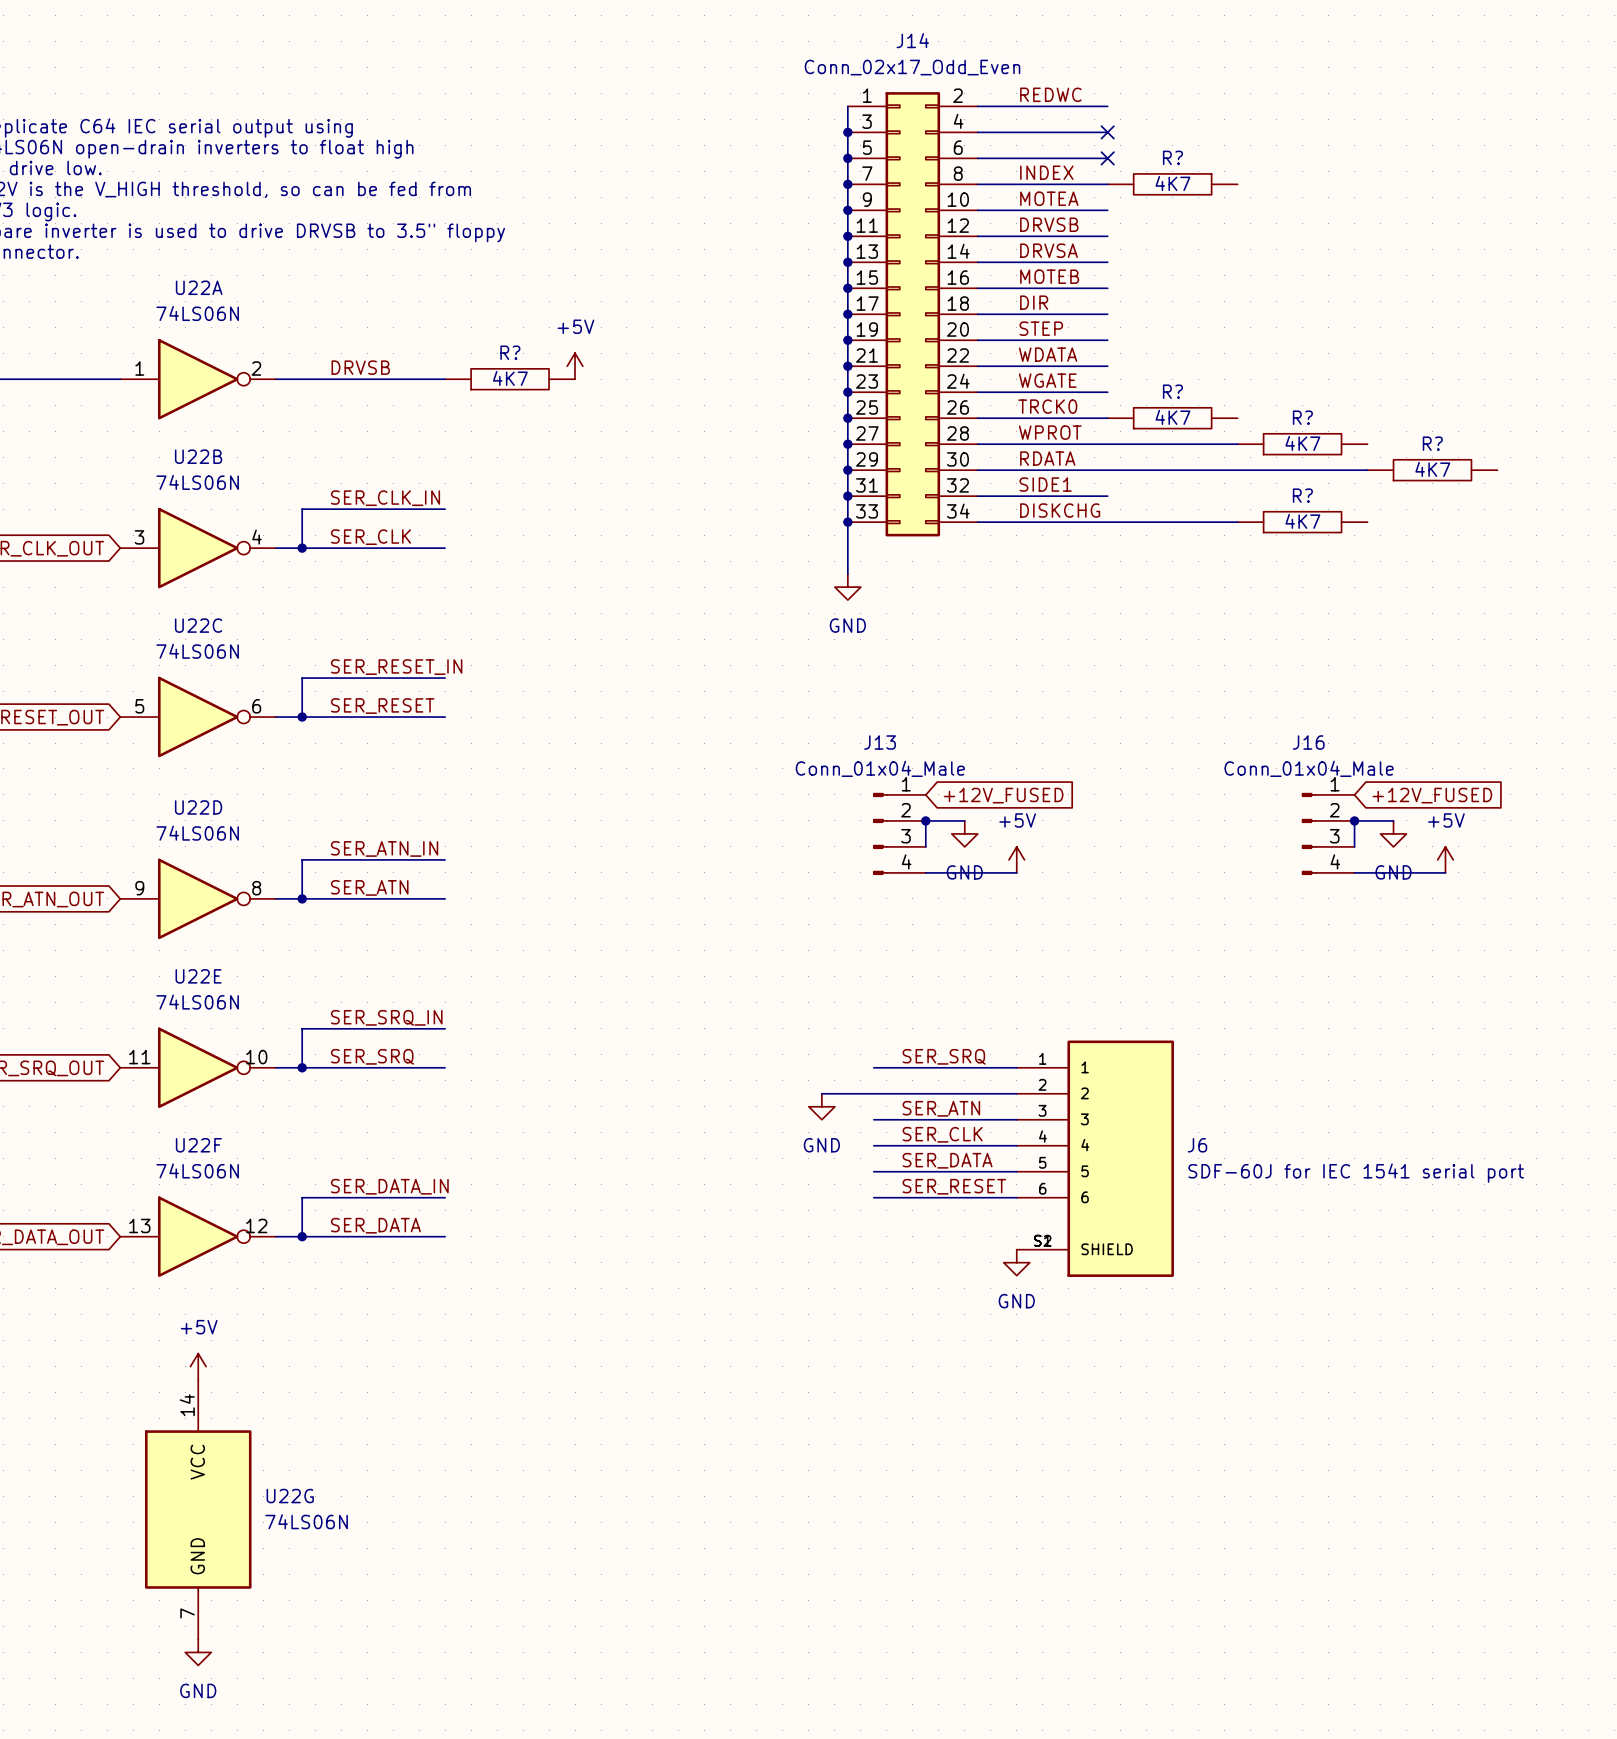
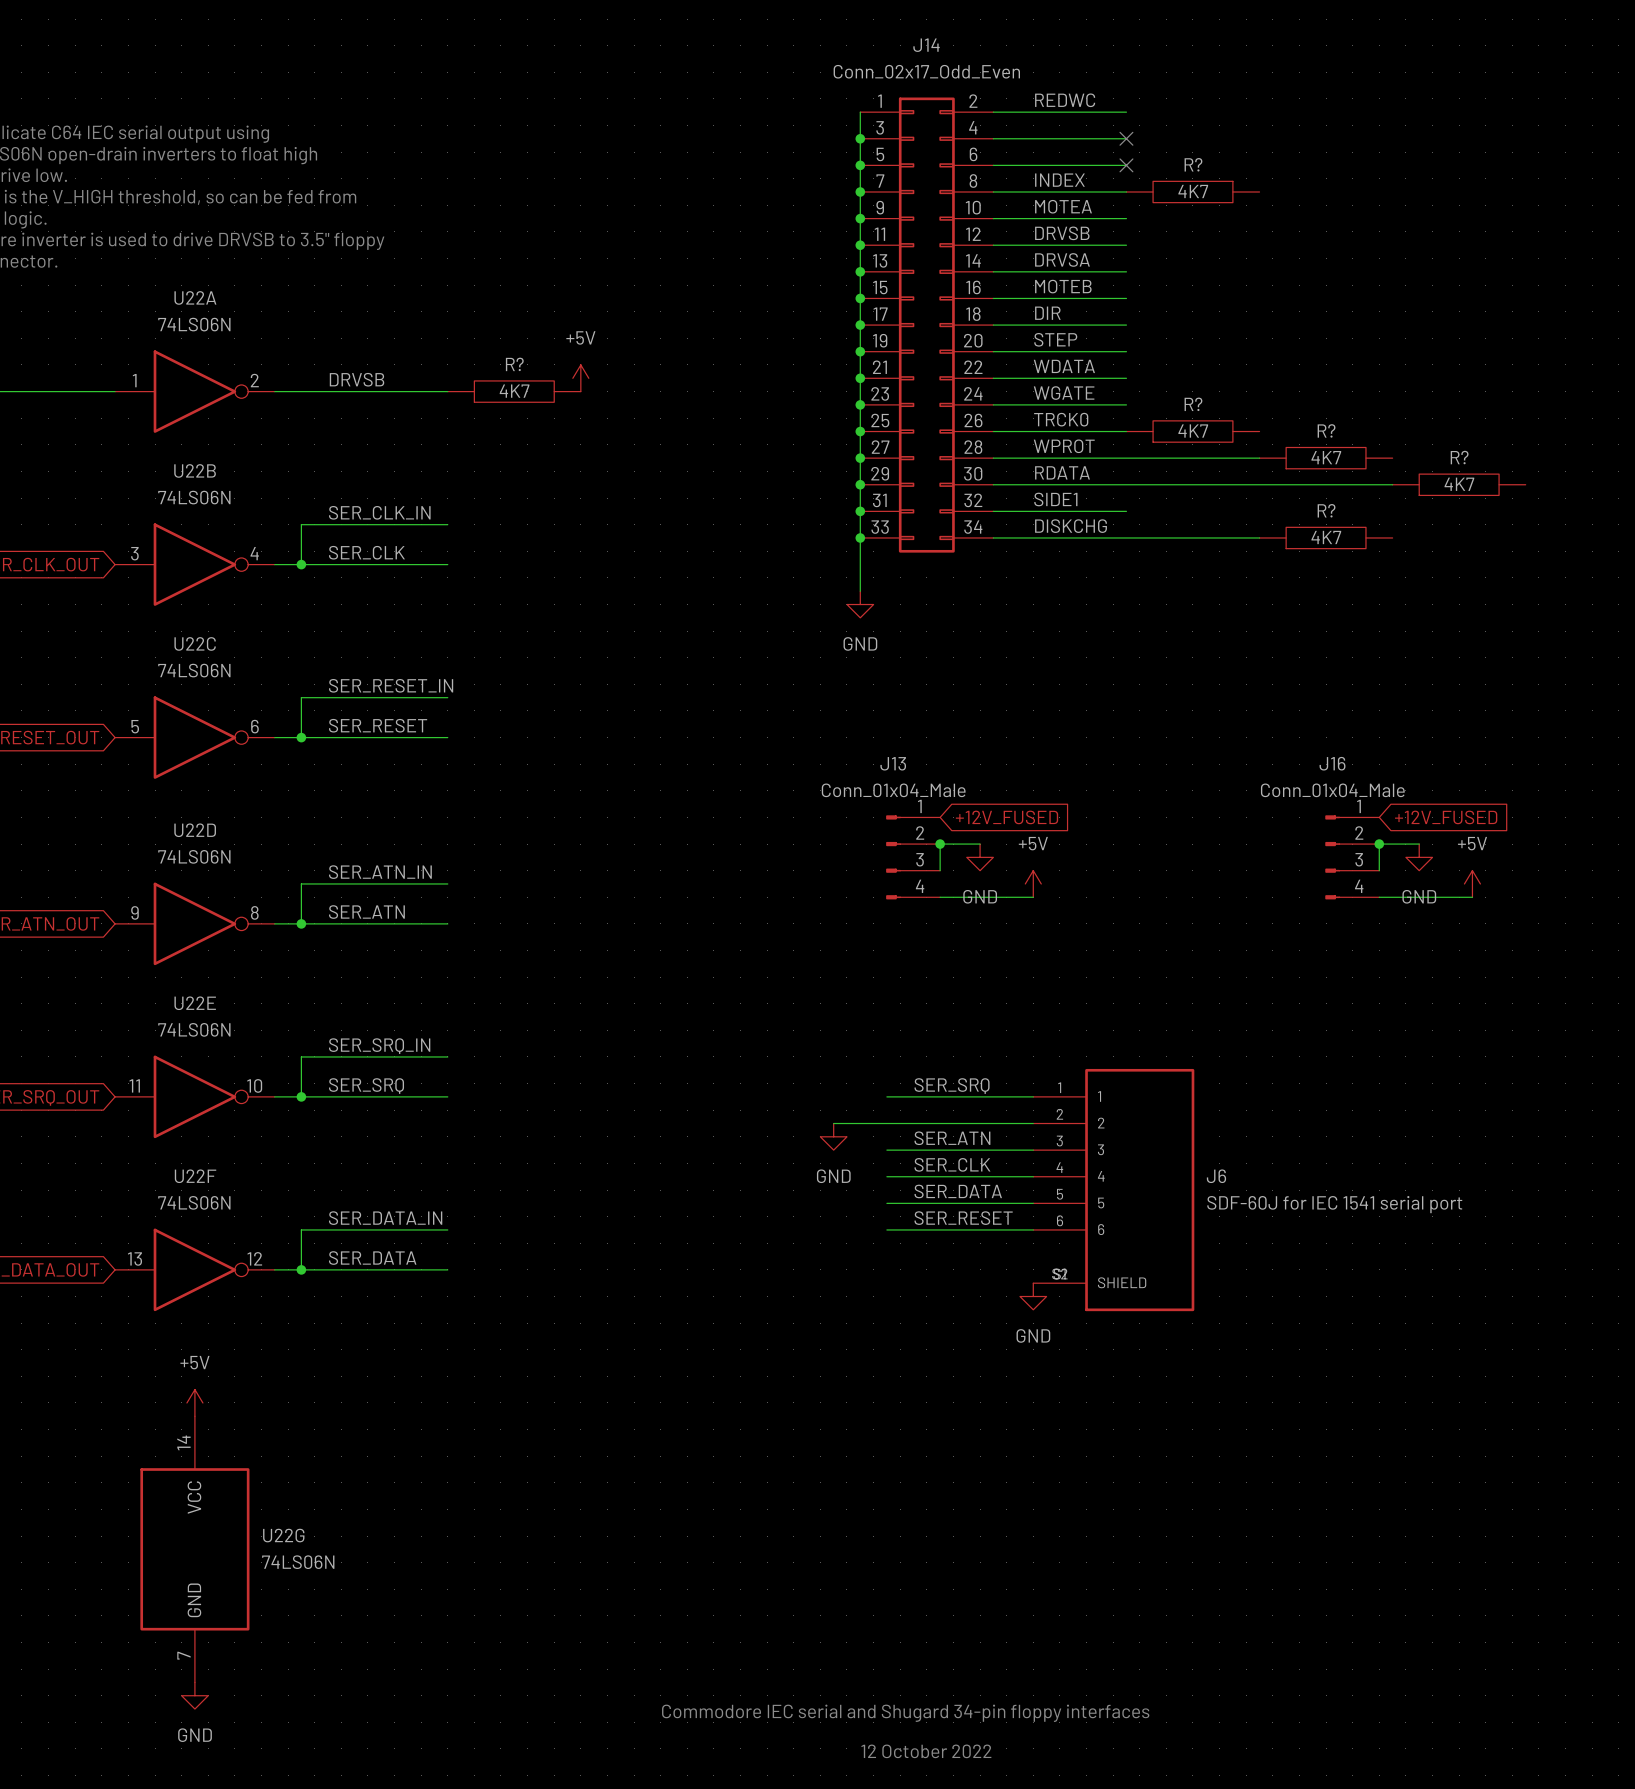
text: none -> Commodore IEC serial and Shugard 34-pin floppy interfaces (905, 1713)
text: none -> 12 October 2022 (926, 1751)

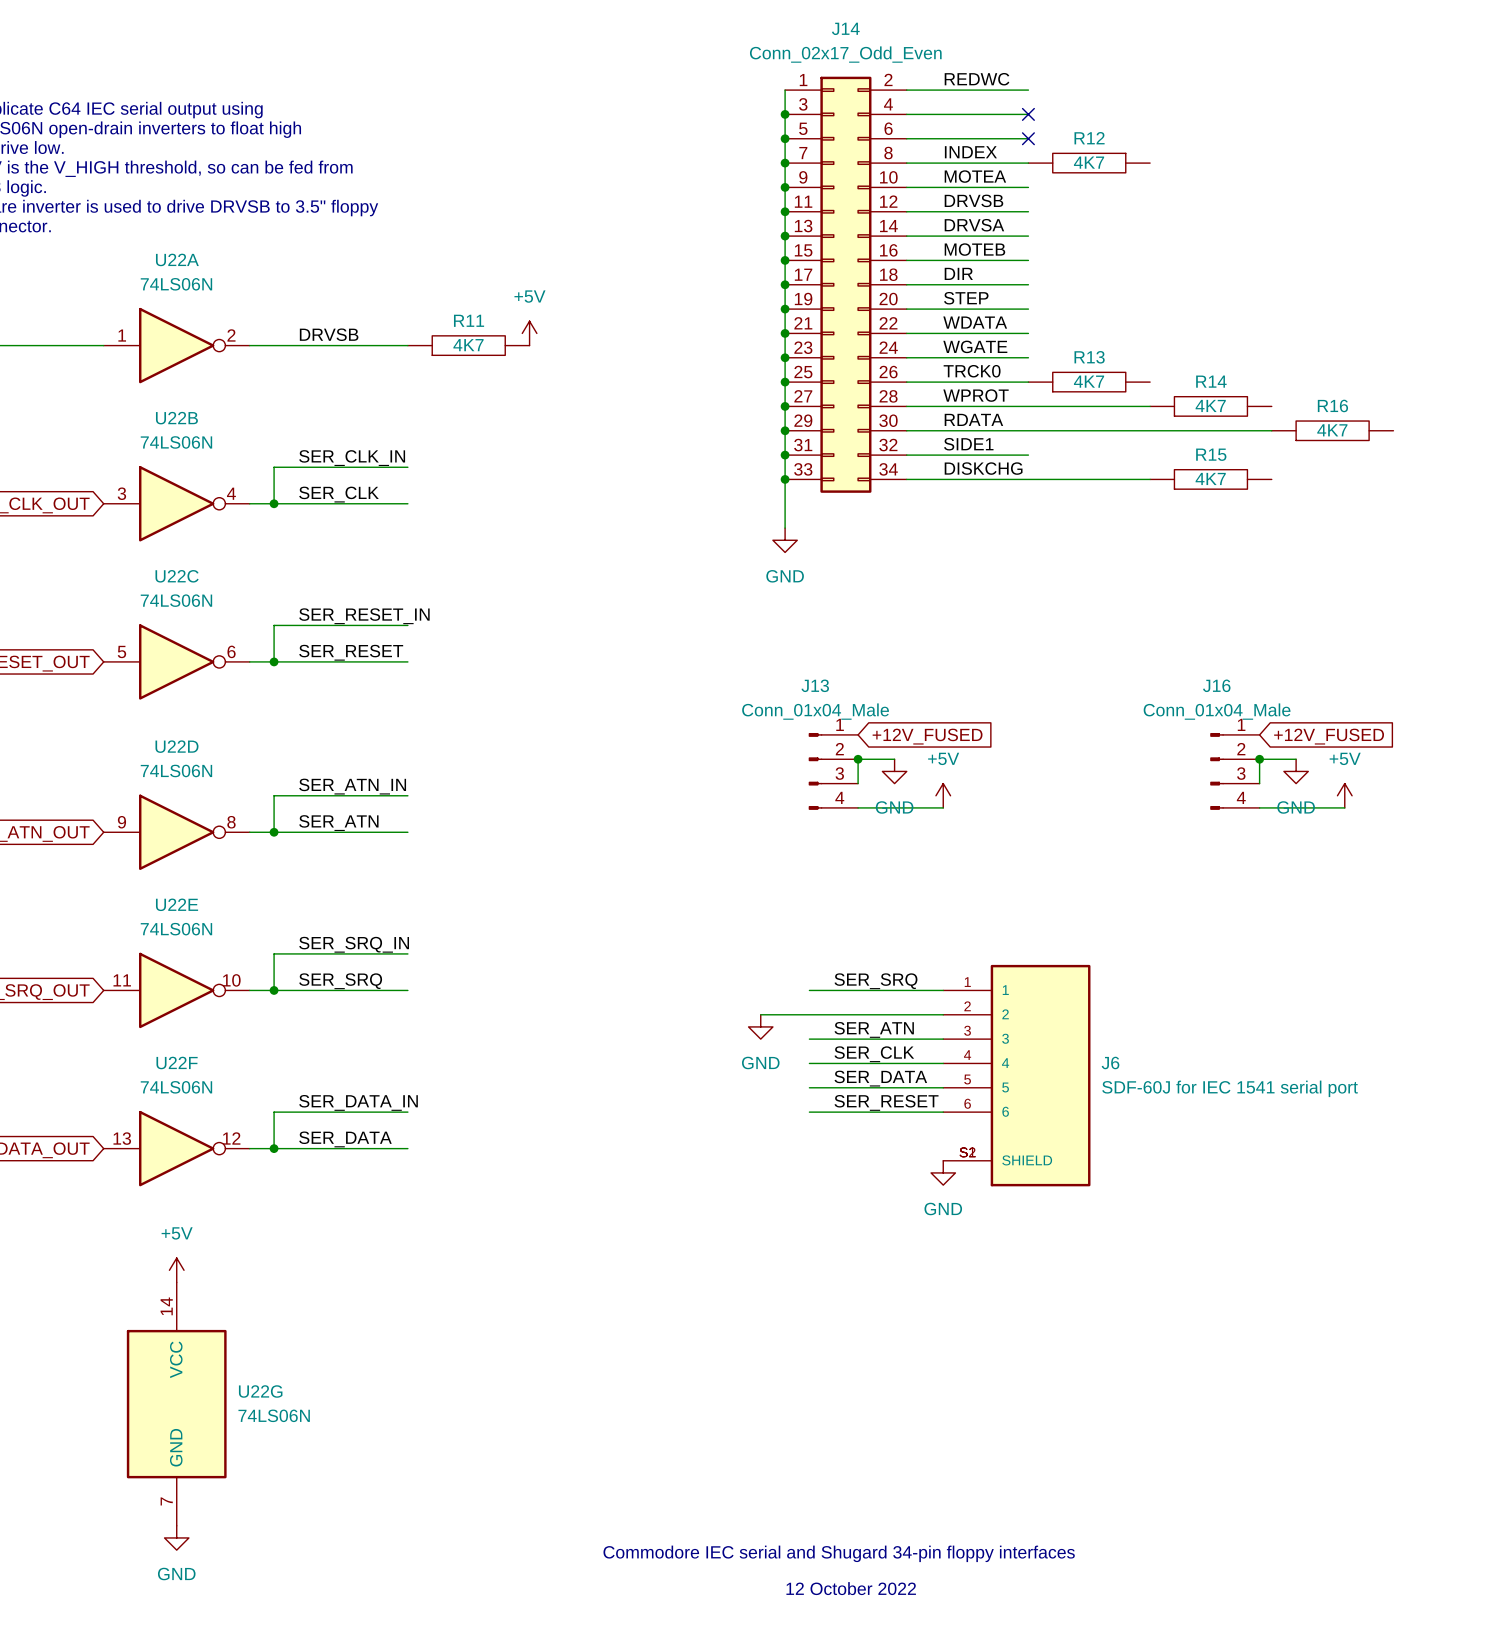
R? name: R? (1193, 164) -> R12 (1089, 138)
R? name: R? (514, 364) -> R11 (469, 320)
R? name: R? (1193, 404) -> R13 (1089, 357)
R? name: R? (1326, 430) -> R14 (1211, 381)
R? name: R? (1459, 457) -> R16 (1332, 405)
R? name: R? (1326, 510) -> R15 (1211, 454)

